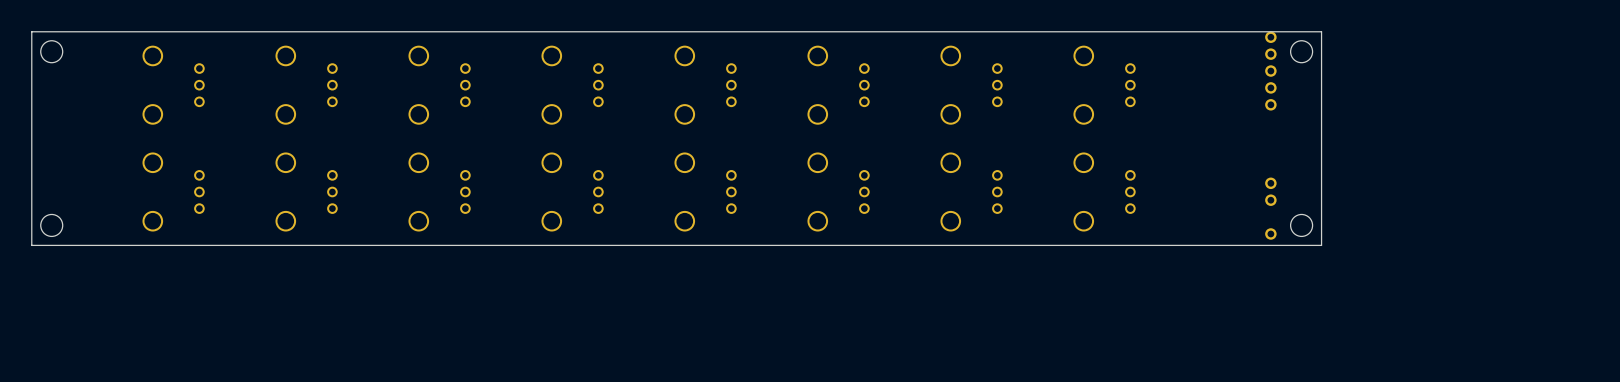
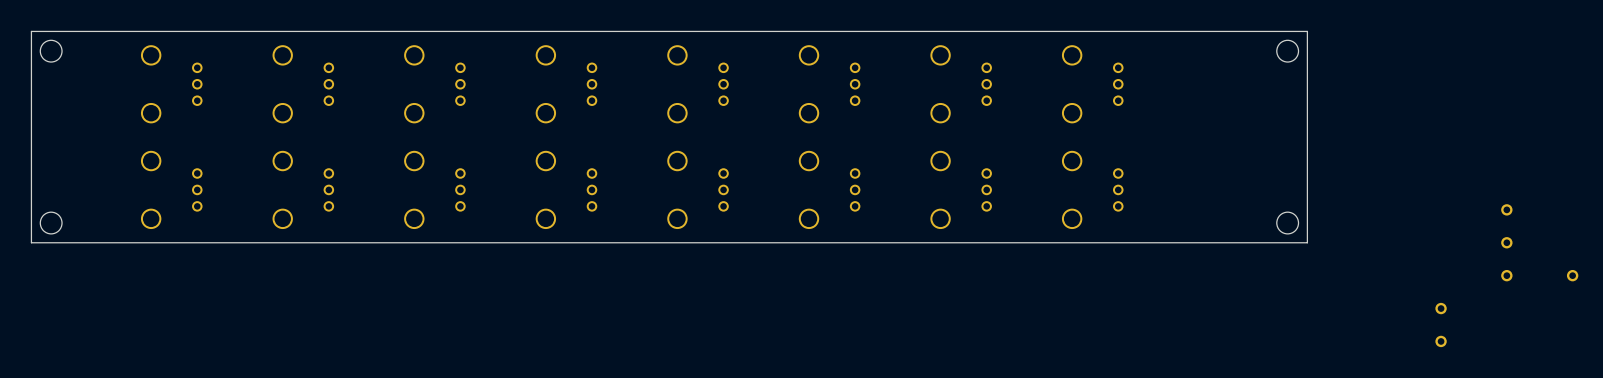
part: (1270, 37) -> none
part: (1270, 54) -> none
part: (1270, 71) -> none
part: (1270, 87) -> none
part: (1270, 104) -> none
part: (1270, 183) -> none
part: (1270, 200) -> none
part: none -> (1506, 209)
part: (1270, 233) -> none
part: none -> (1506, 242)
part: none -> (1506, 275)
part: none -> (1572, 275)
part: none -> (1441, 308)
part: none -> (1441, 341)

